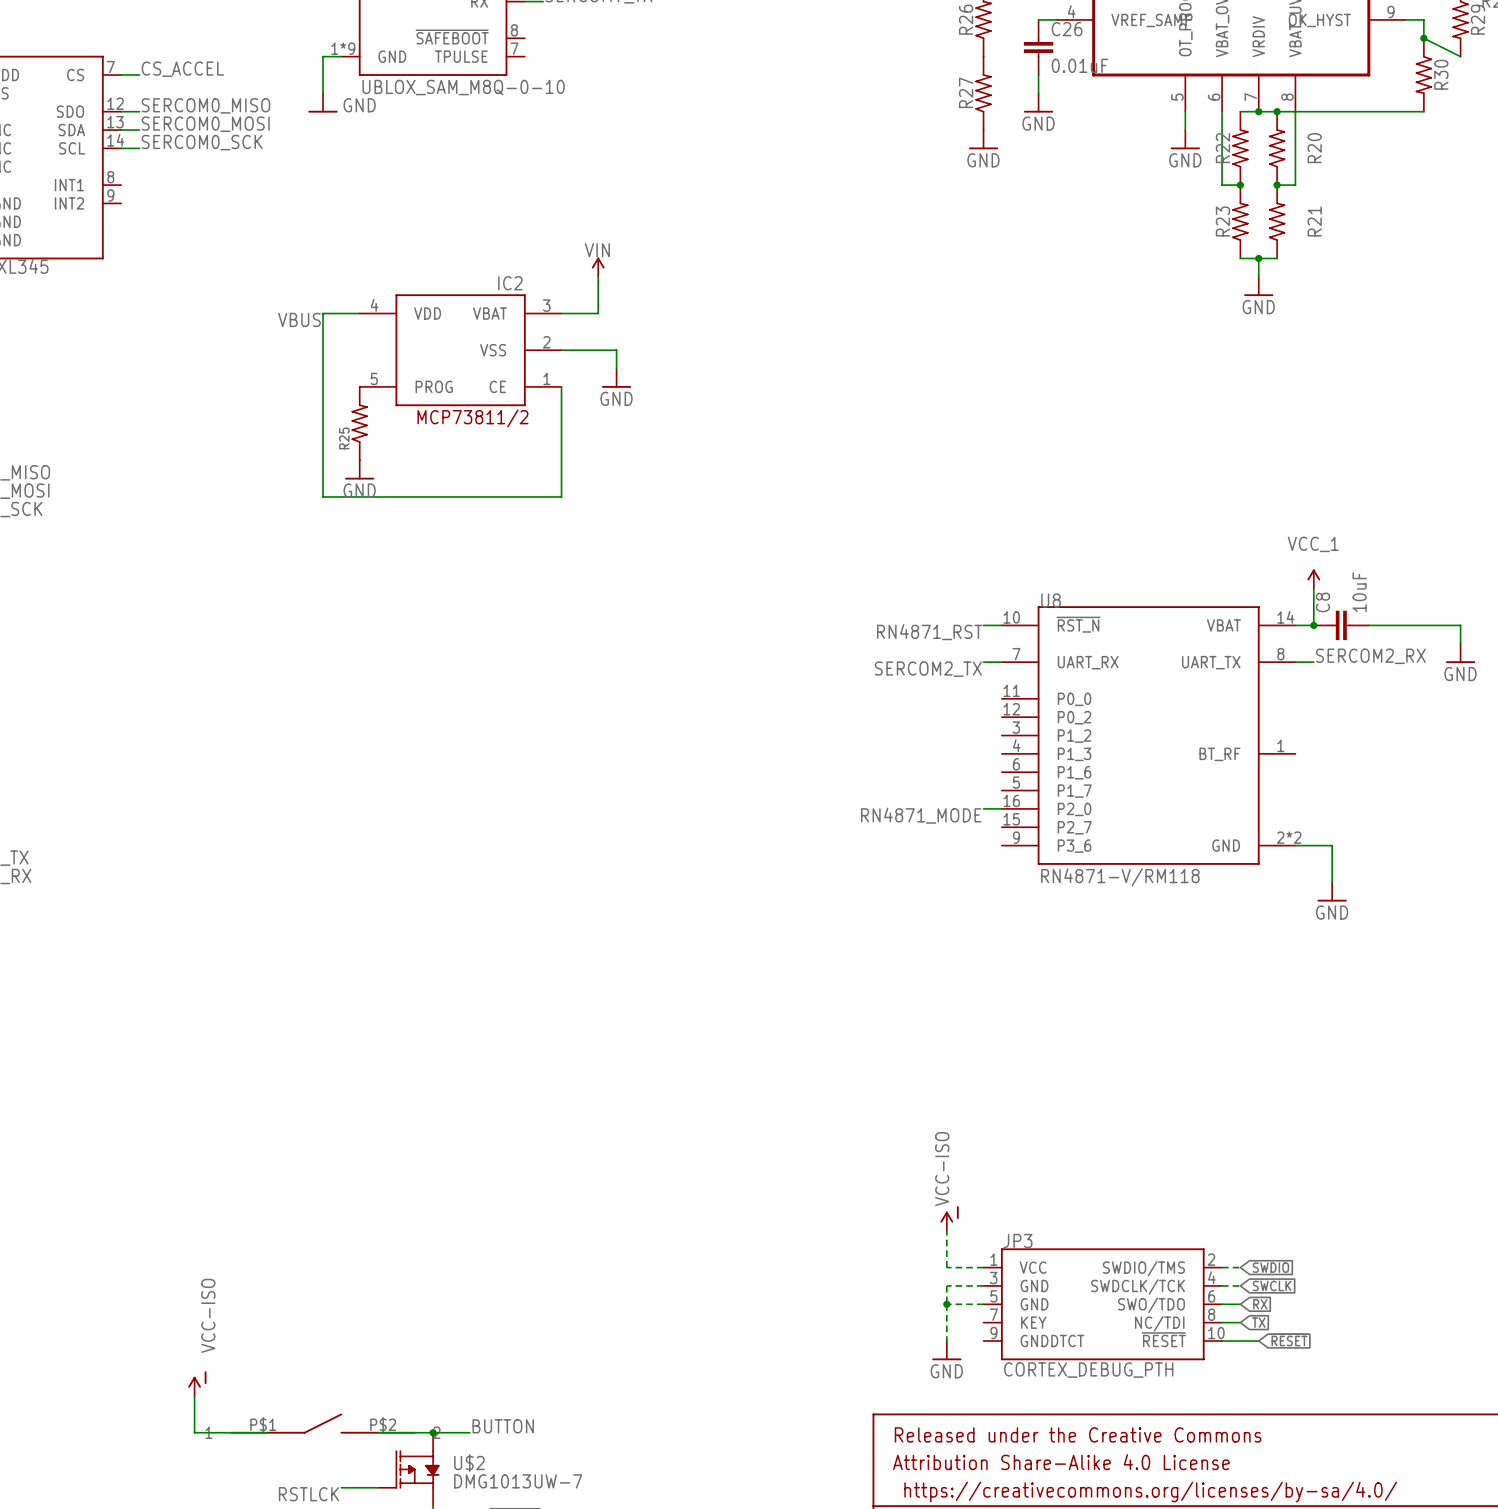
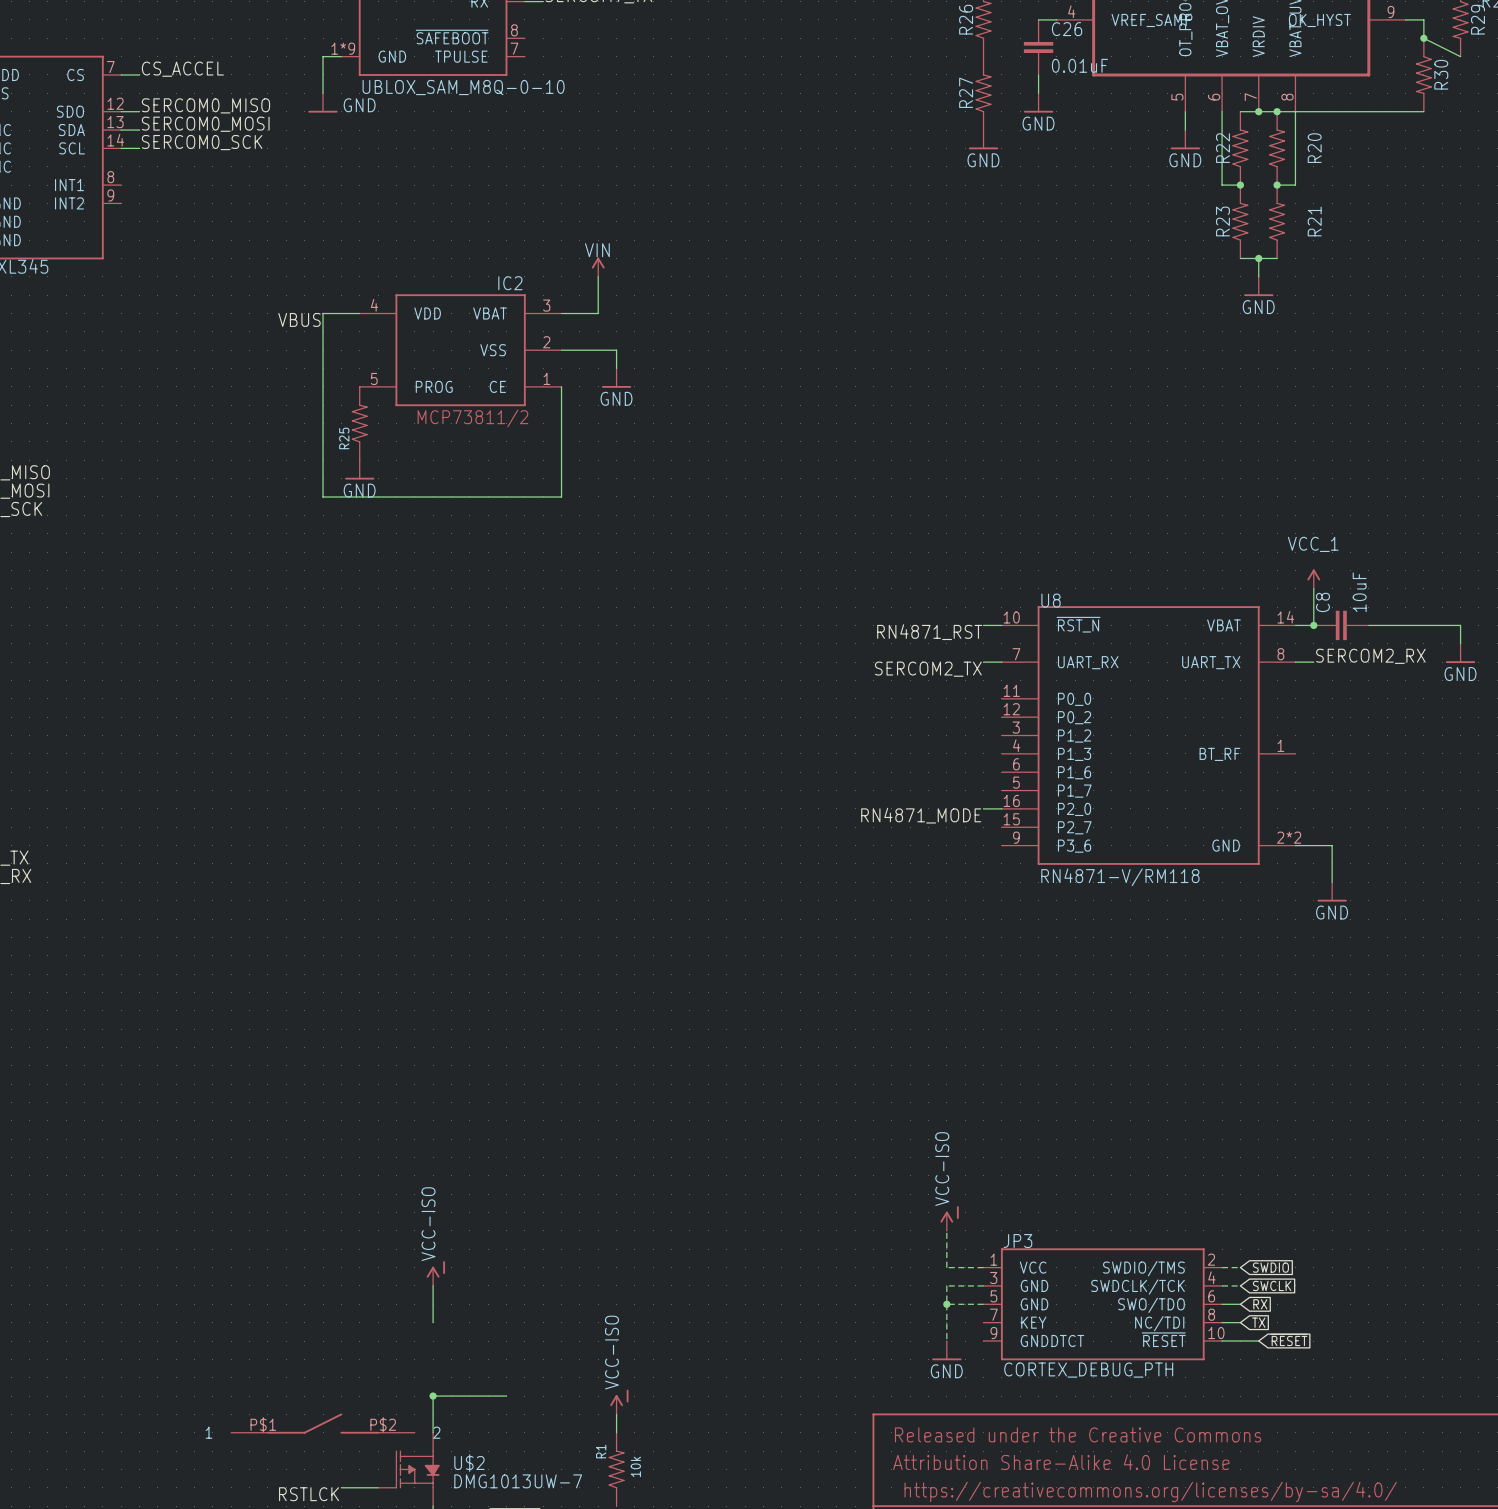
power symbol: none -> VCC-ISO (435, 1273)
wire: none -> (433, 1285) (433, 1322)
power symbol: VCC-ISO (197, 1383) -> none
wire: (194, 1396) (194, 1432) (267, 1432) -> none
wire: none -> (506, 1396) (433, 1396) (433, 1432)
power symbol: none -> VCC-ISO (619, 1402)
wire: none -> (616, 1414) (616, 1432)
label: BUTTON (503, 1426) -> none
wire: (378, 1432) (469, 1432) -> none
junction position: (433, 1432) -> (433, 1396)
R1: none -> 10k (616, 1469)

